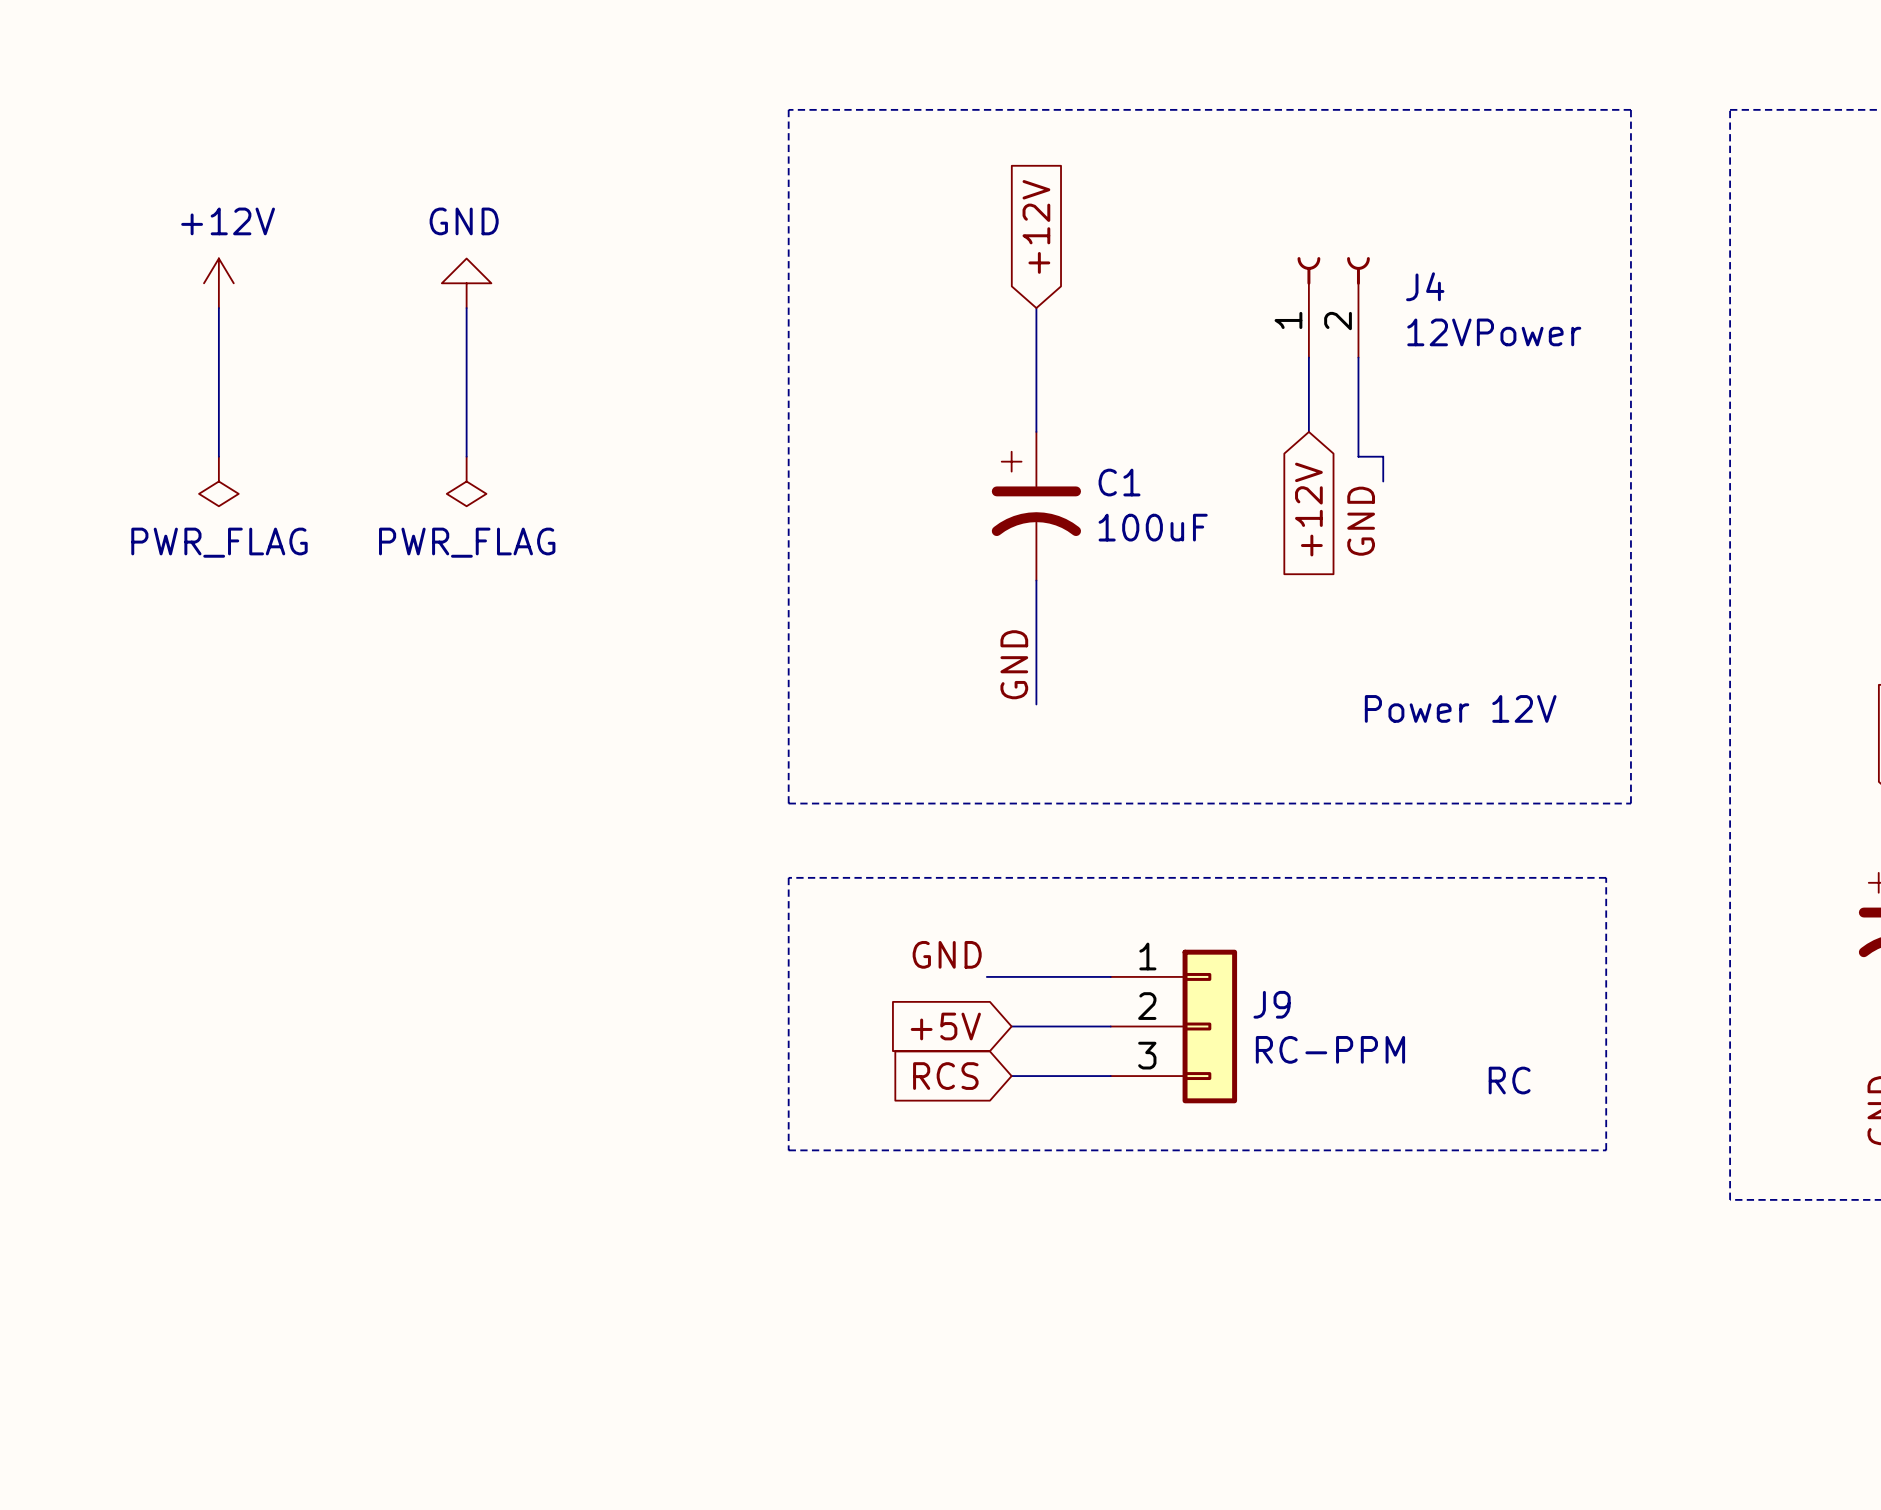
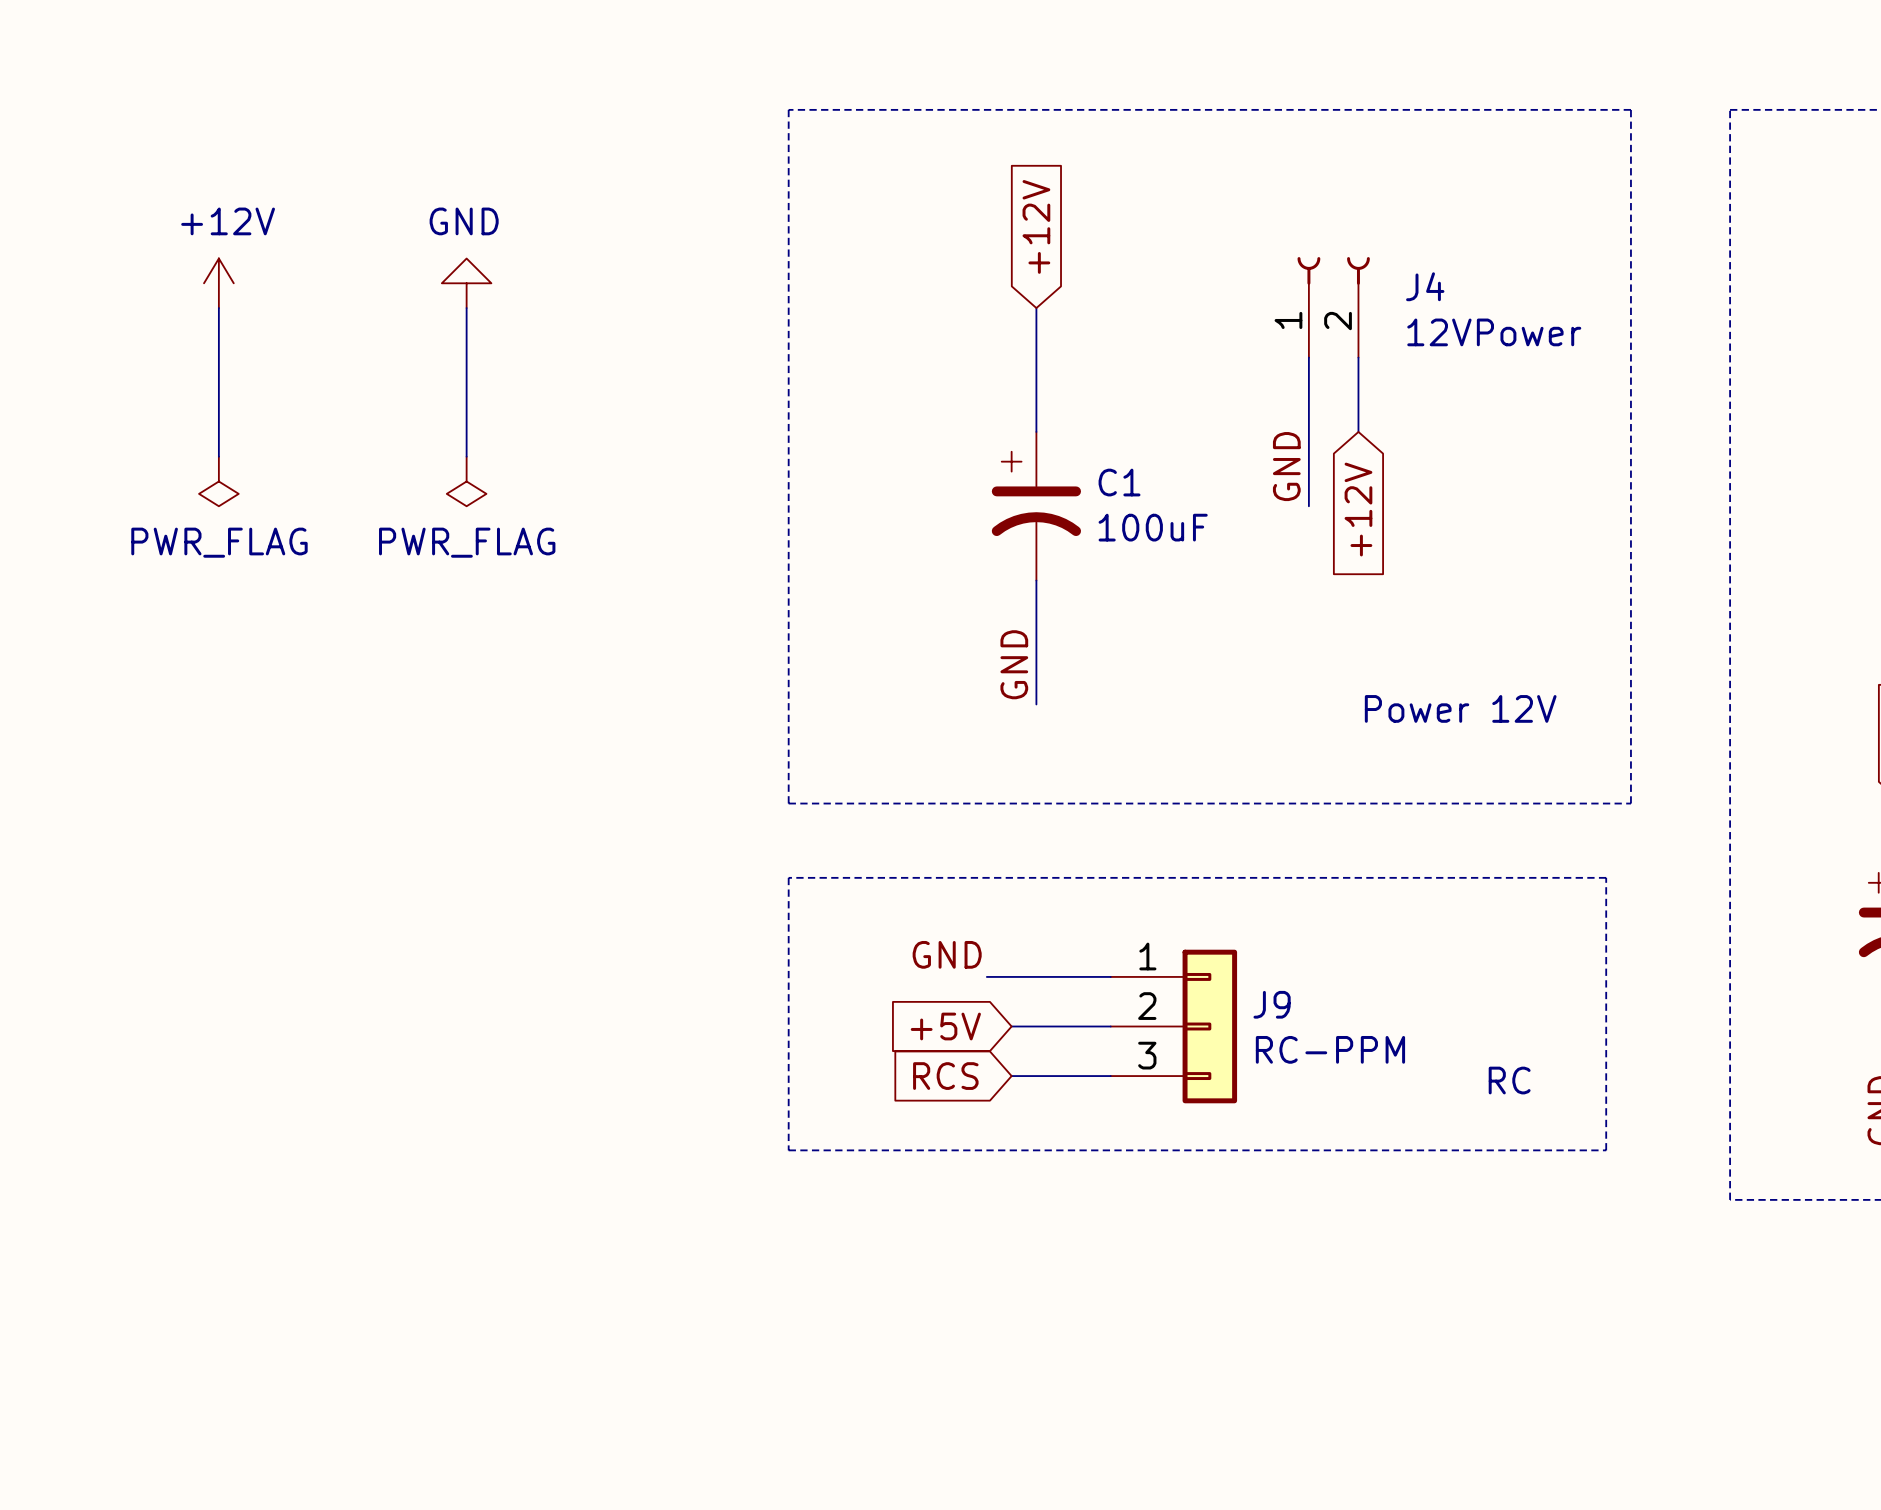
wire: none -> (1308, 431) (1308, 506)
wire: (1358, 431) (1358, 456) (1383, 456) (1383, 481) -> none
global label position: +12V (1308, 509) -> +12V (1358, 509)
label position: GND (1361, 521) -> GND (1286, 466)

